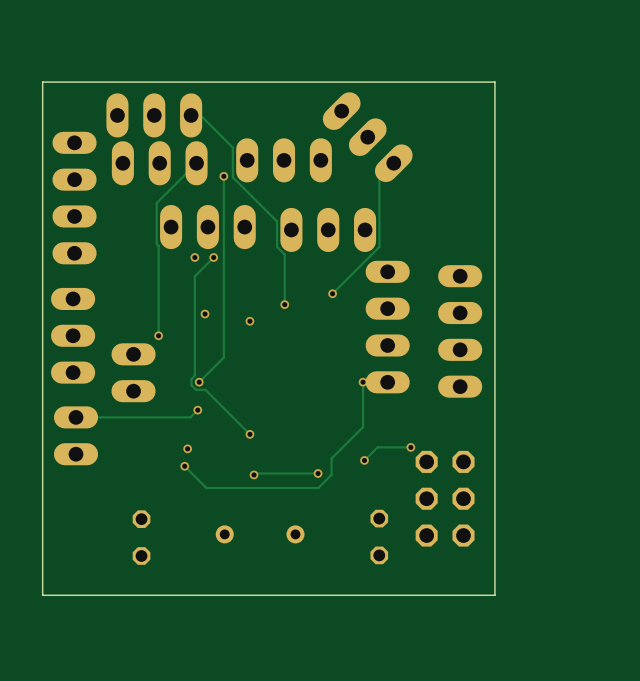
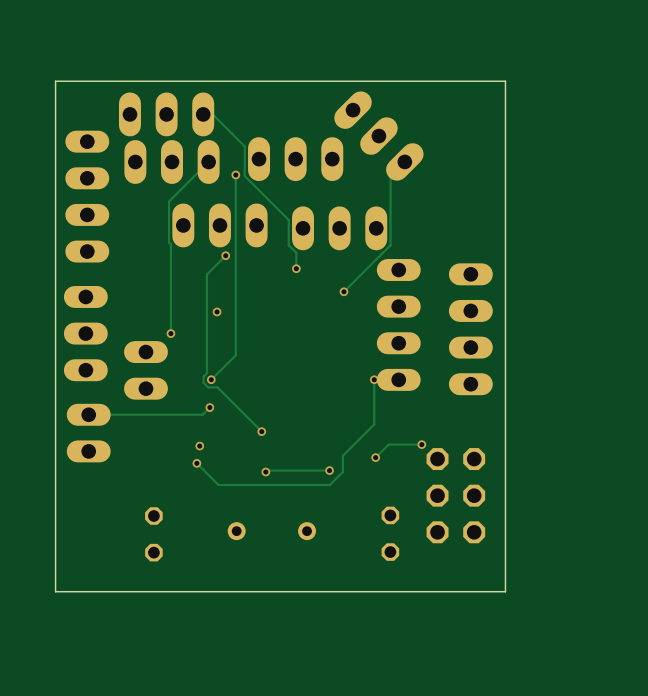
via: (194, 257) -> none
track: (284, 270) (284, 304) -> none
via: none -> (296, 268)
via: (284, 304) -> none
via: (249, 321) -> none

